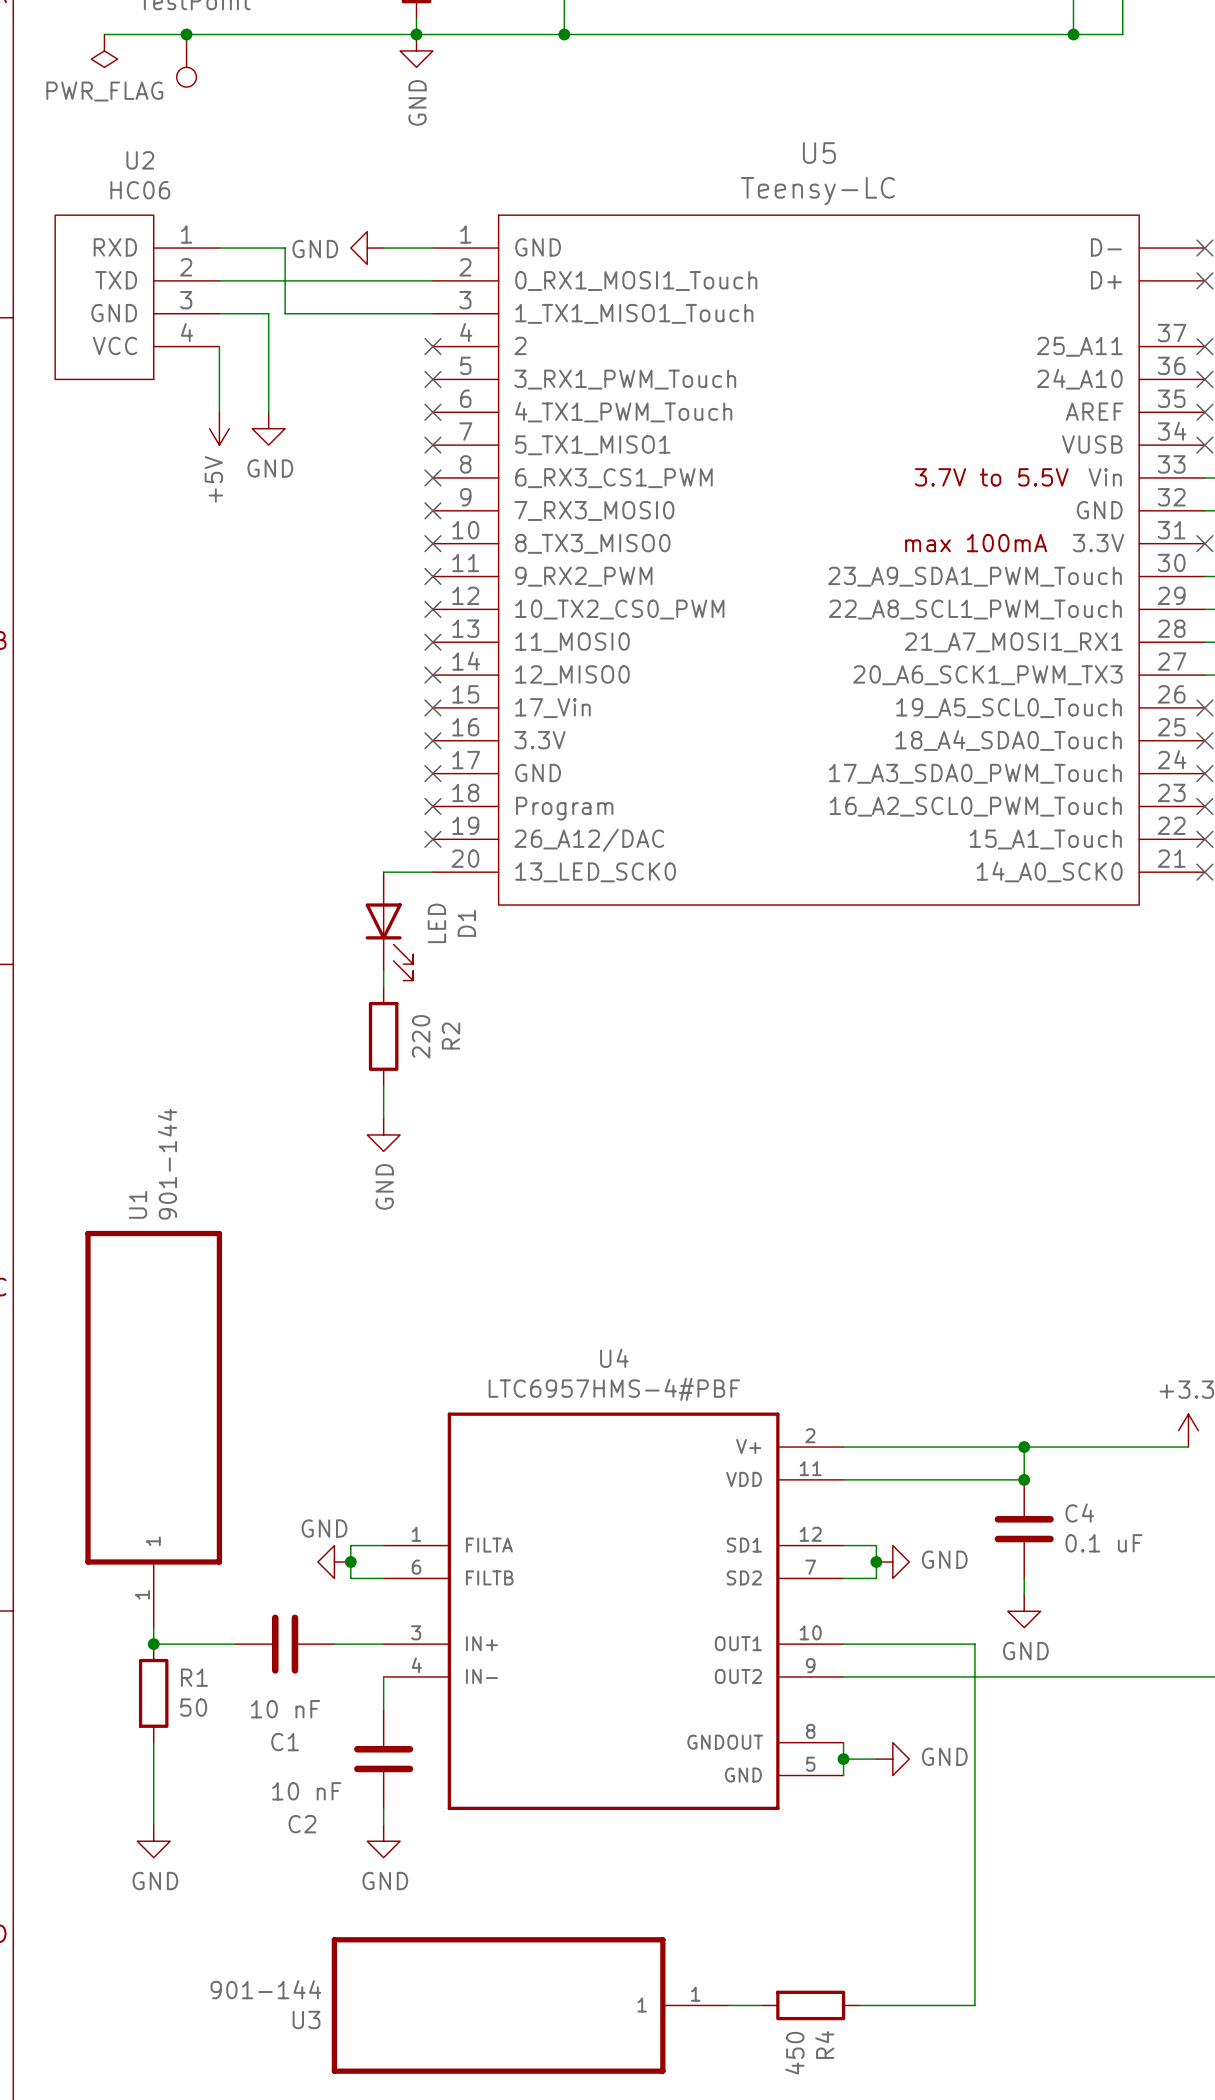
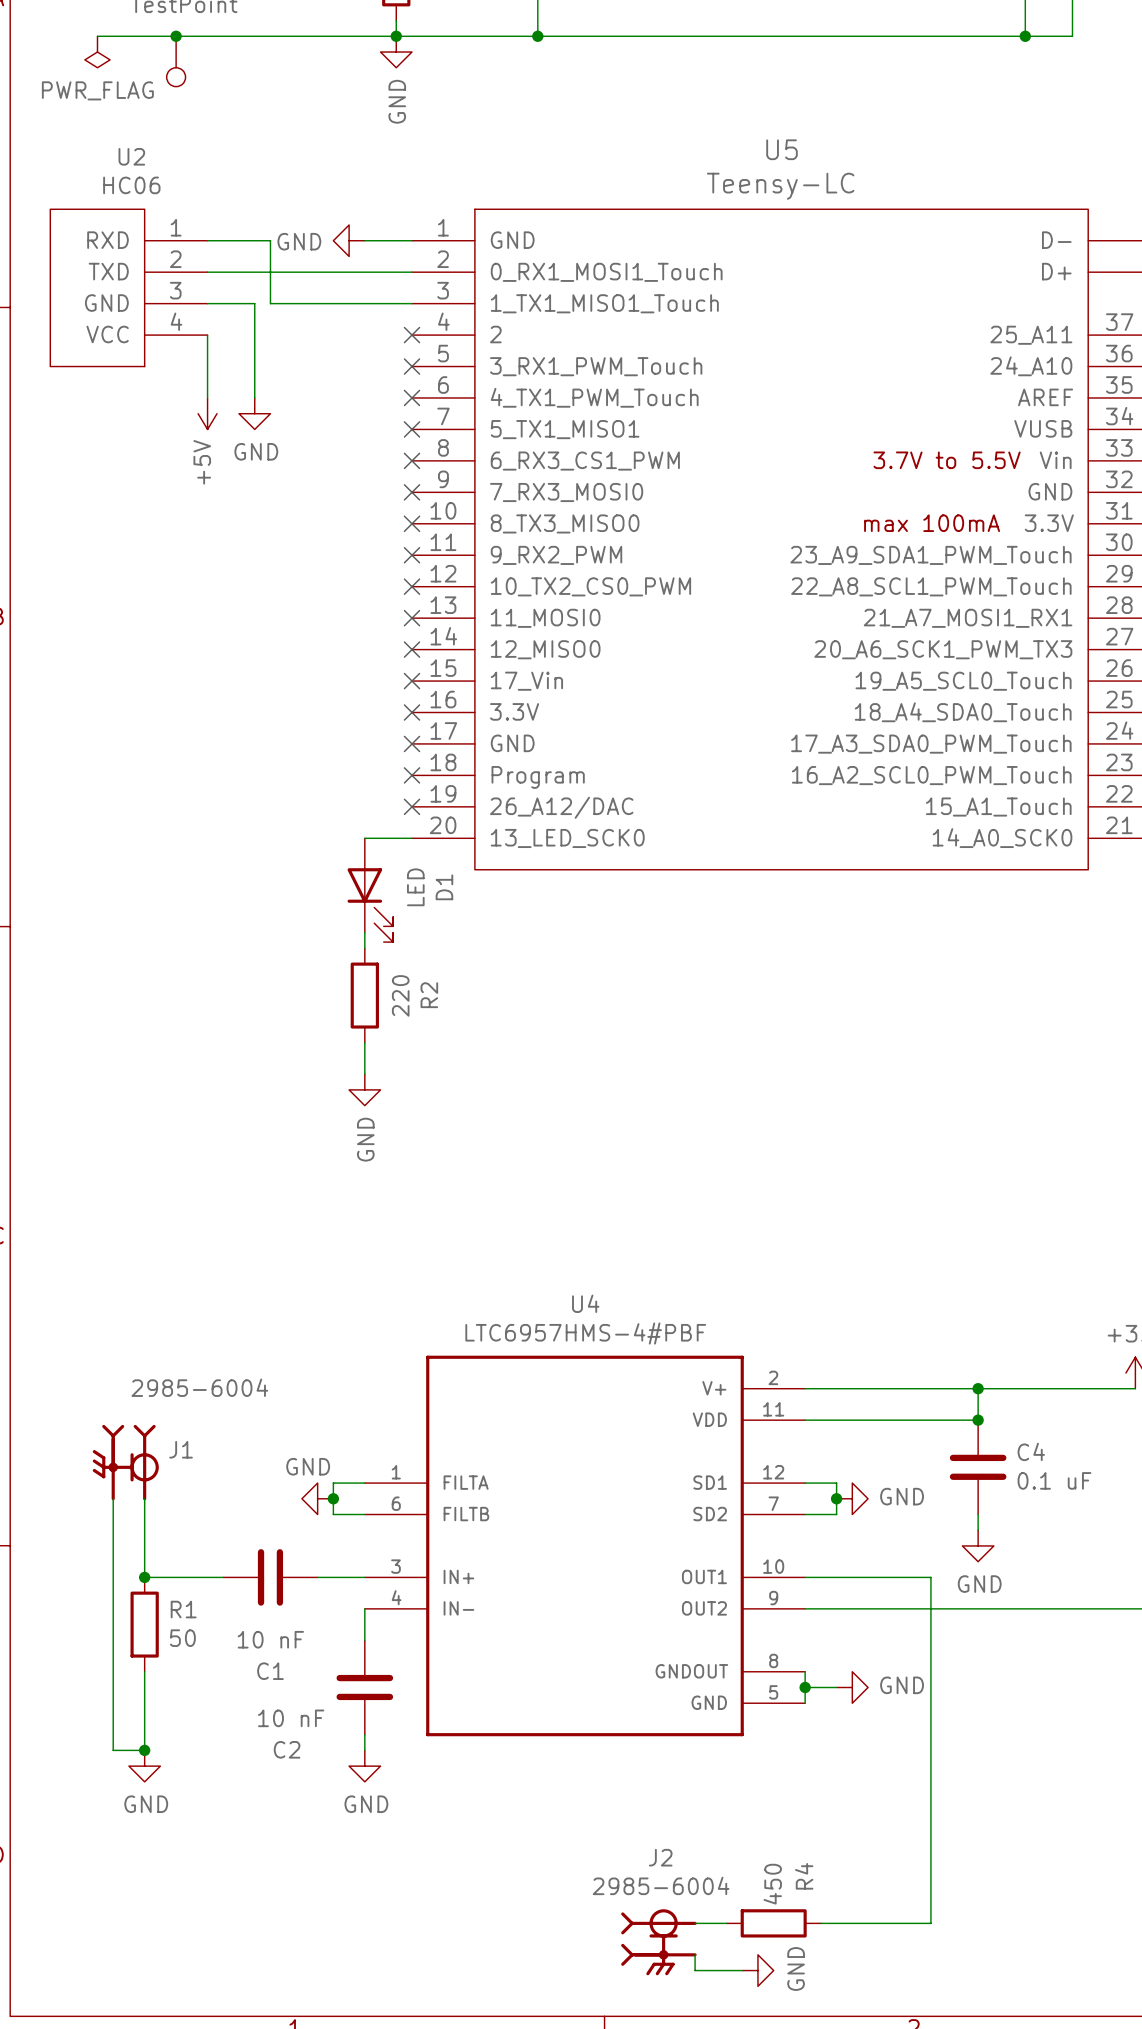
U1: 901-144 (153, 1429) -> none
J1: none -> 2985-6004 (125, 1462)
wire: none -> (113, 1498) (113, 1750) (144, 1750)
junction: none -> (144, 1750)
U3: 901-144 (530, 2005) -> none
J2: none -> 2985-6004 (658, 1942)
wire: none -> (695, 1954) (695, 1970) (742, 1970)
R4 name position: R4 (824, 2045) -> R4 (804, 1876)
R4 value position: 450 (794, 2053) -> 450 (772, 1884)
power symbol: none -> GND (757, 1970)

